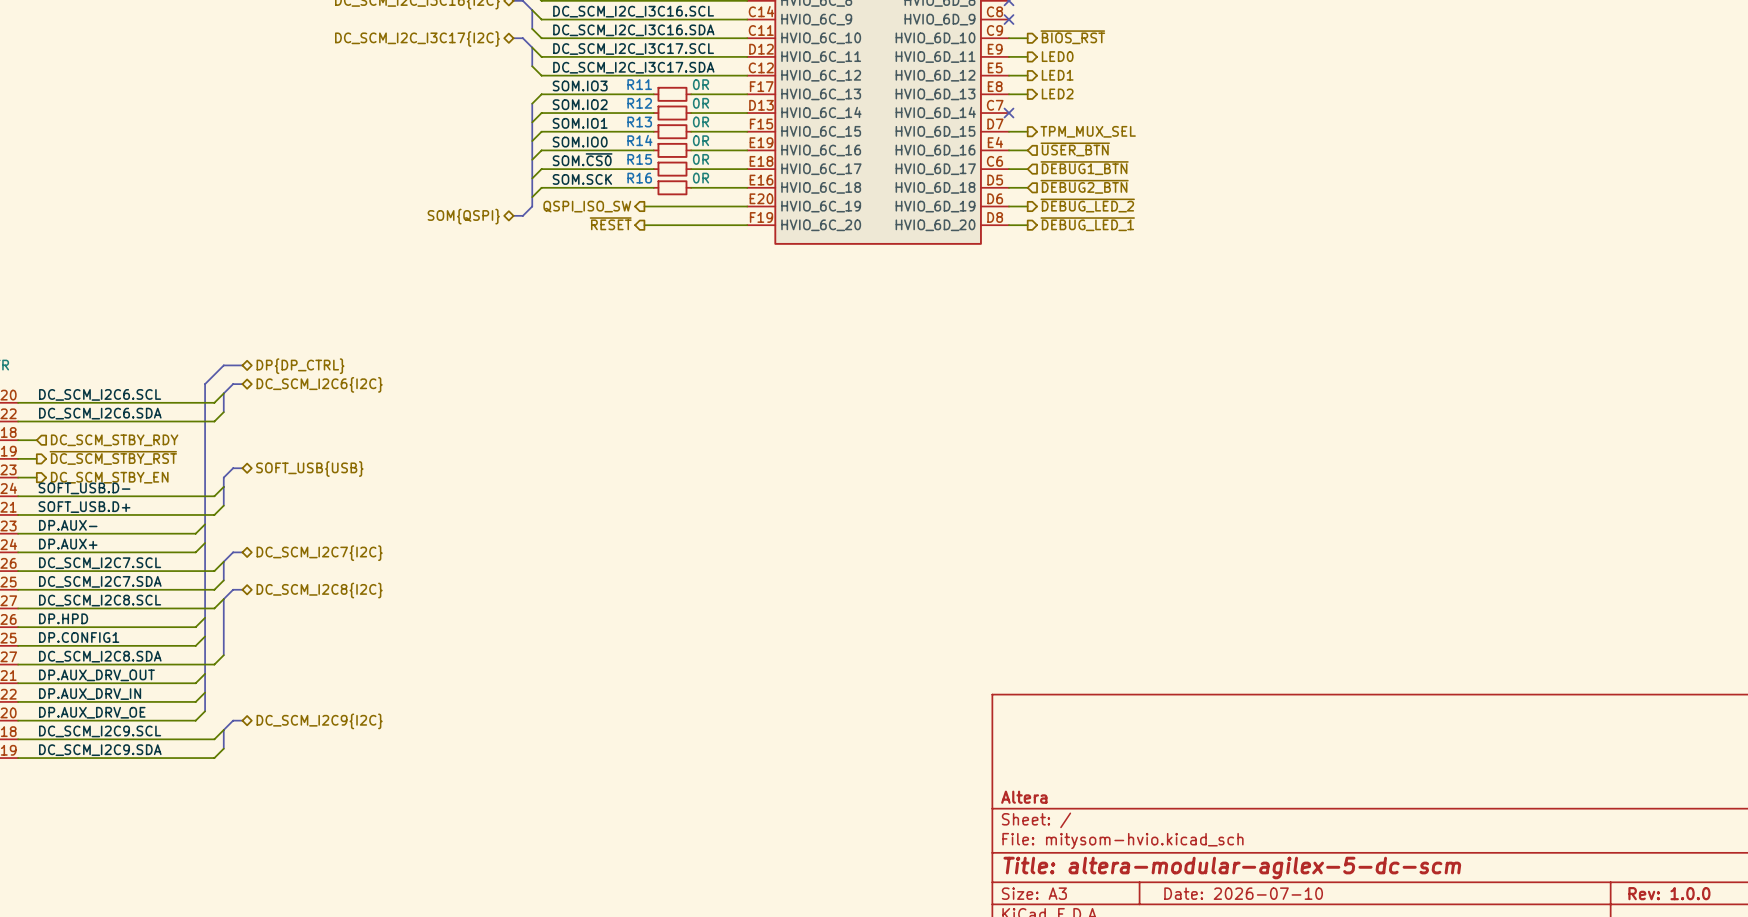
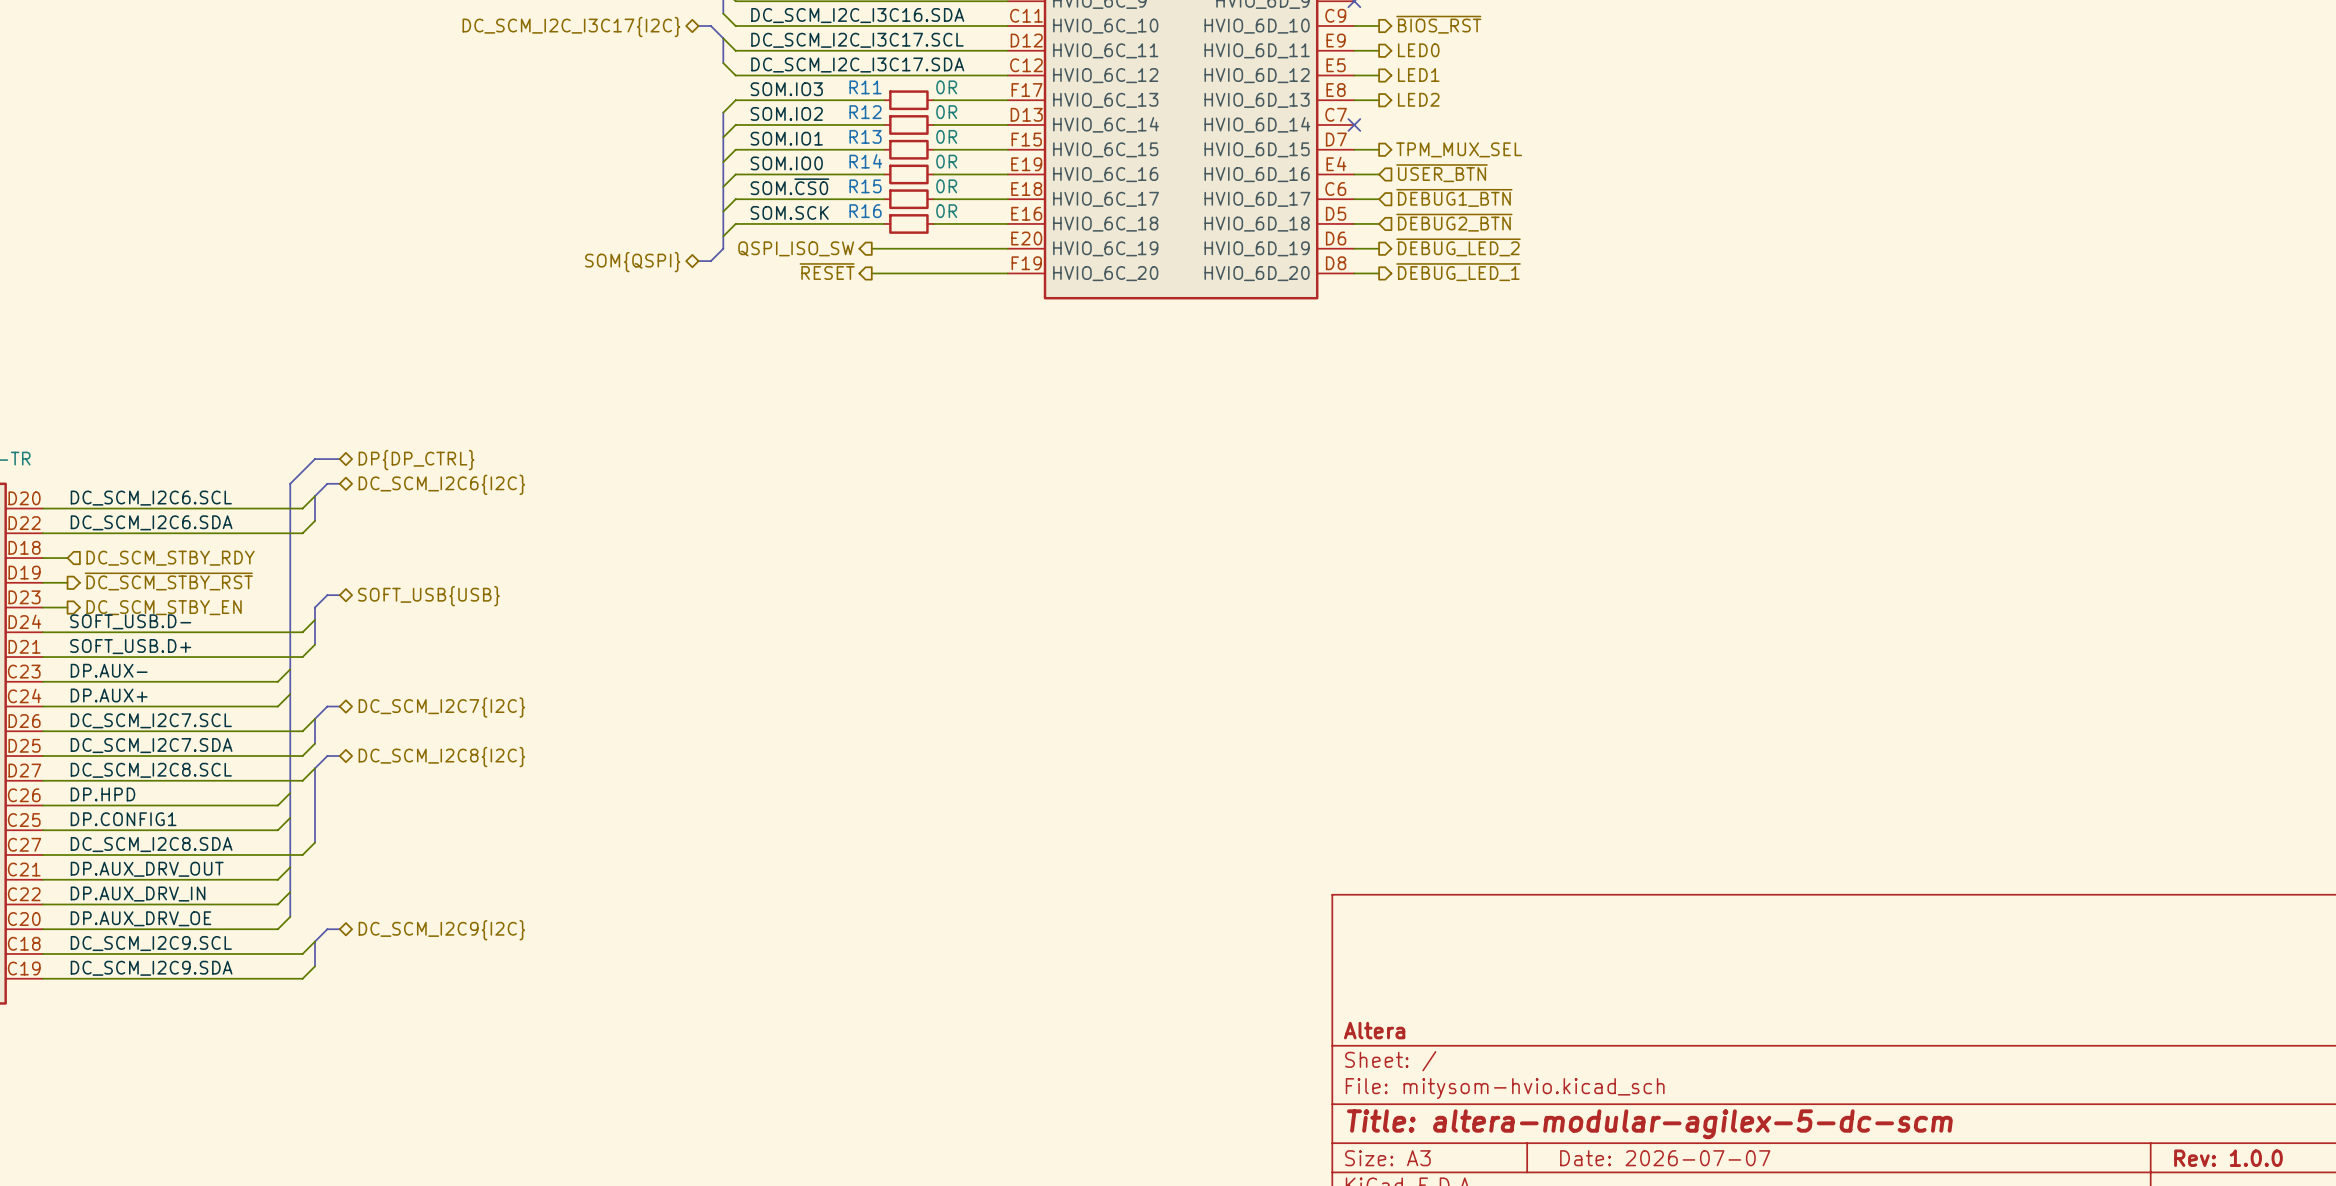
title block: Date: 2026-07-10 (1243, 893) -> Date: 2026-07-07 (1665, 1158)

